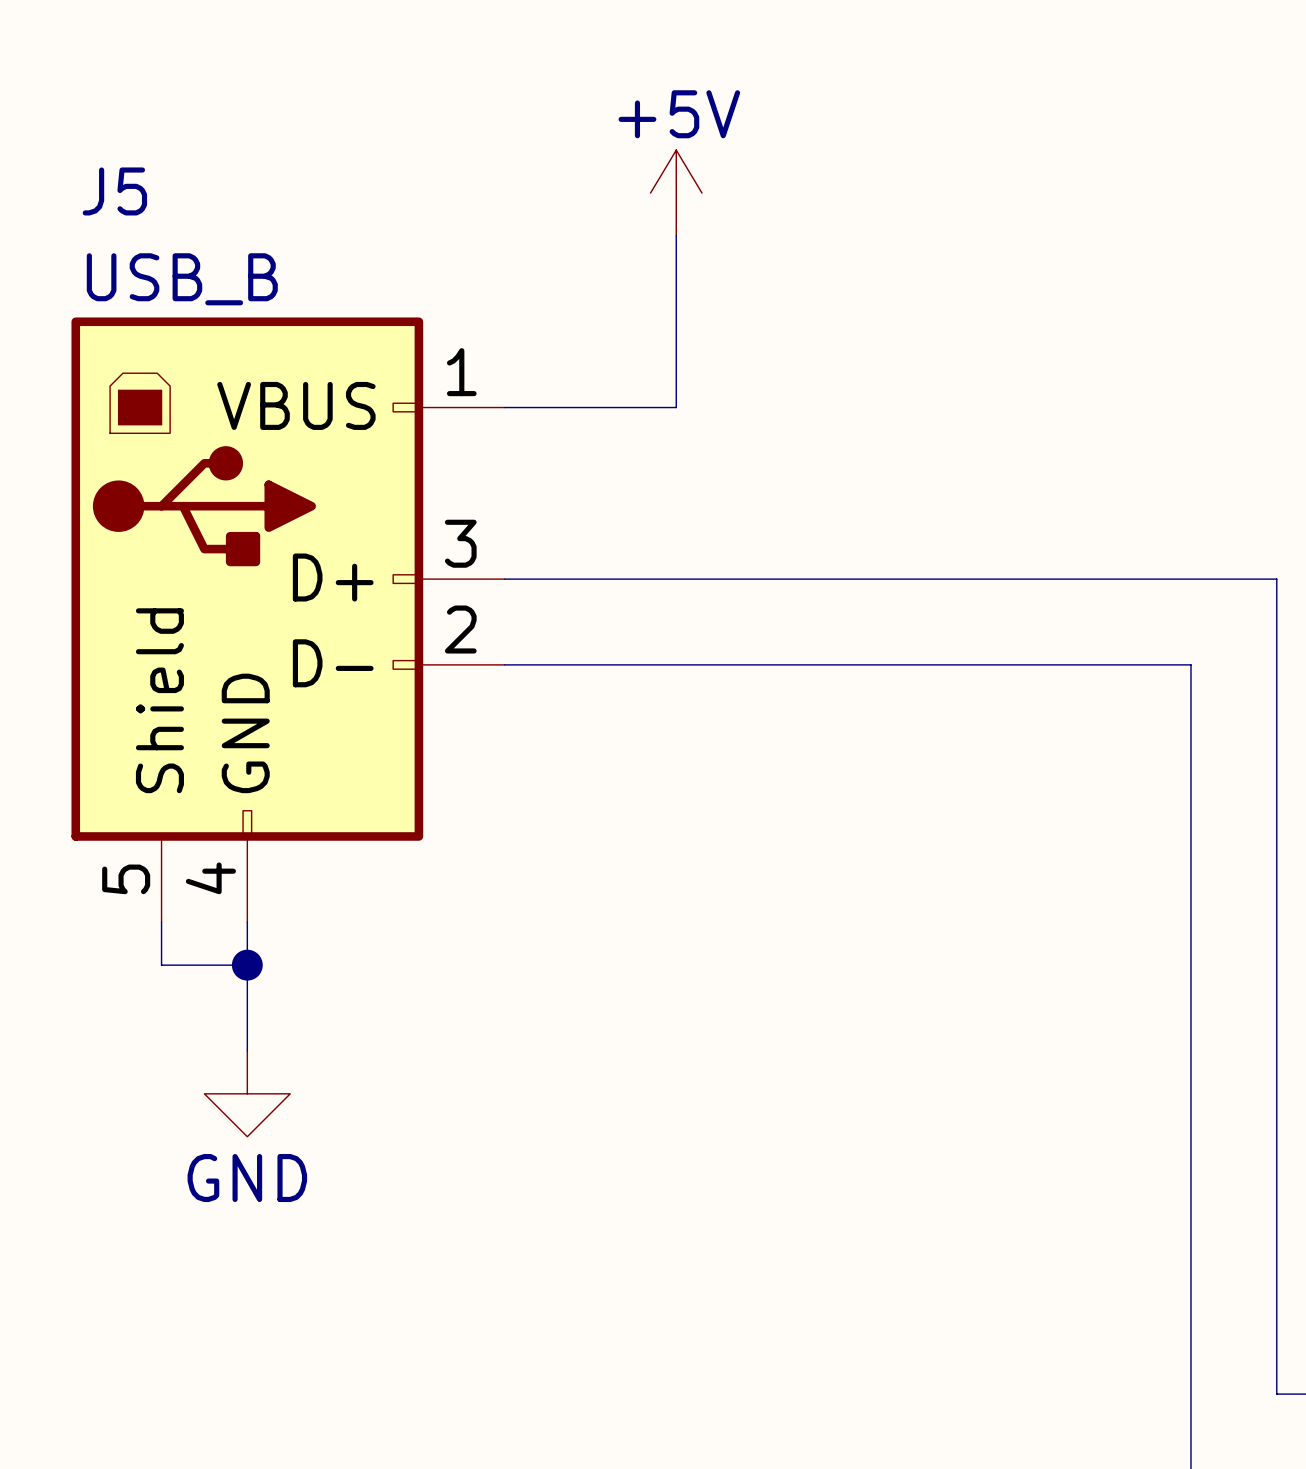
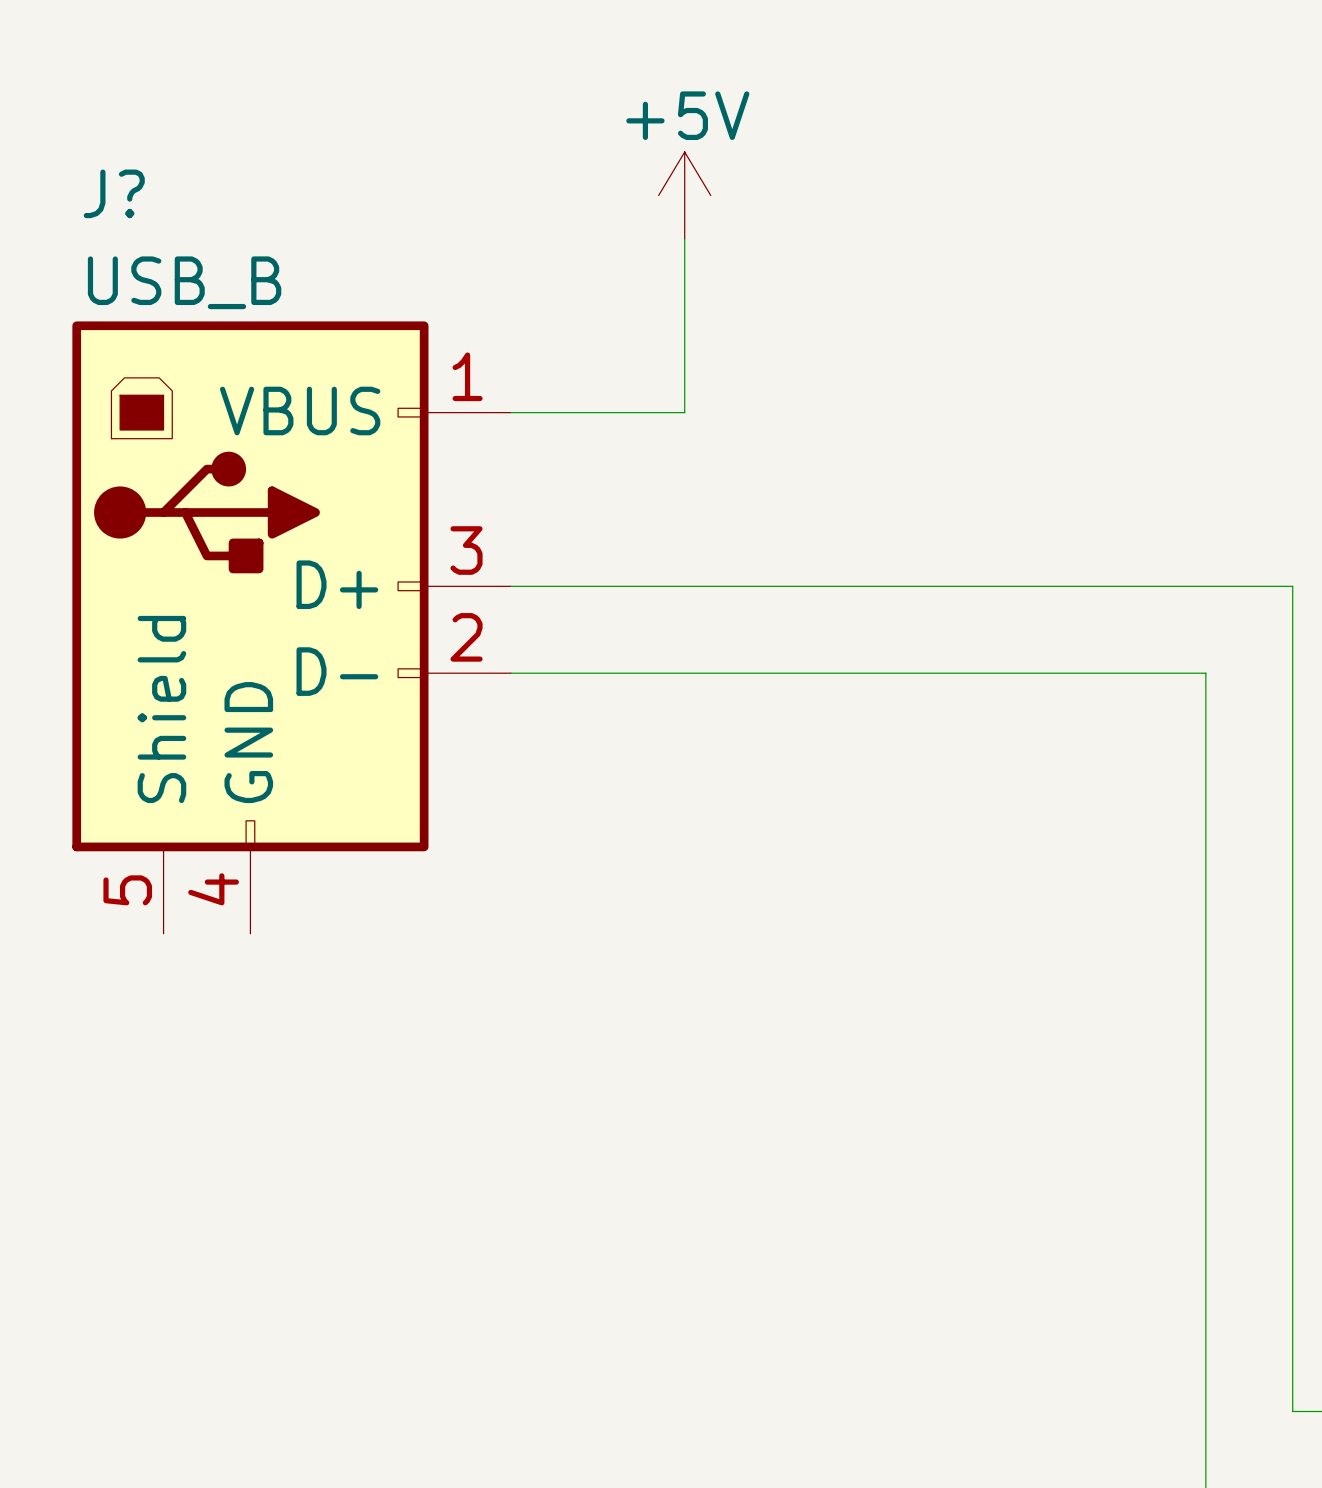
J5 name: J5 (114, 191) -> J? (114, 193)
wire: (161, 922) (161, 965) (247, 965) -> none
wire: (247, 922) (247, 1050) -> none
junction: (247, 965) -> none
power symbol: GND (247, 1093) -> none

